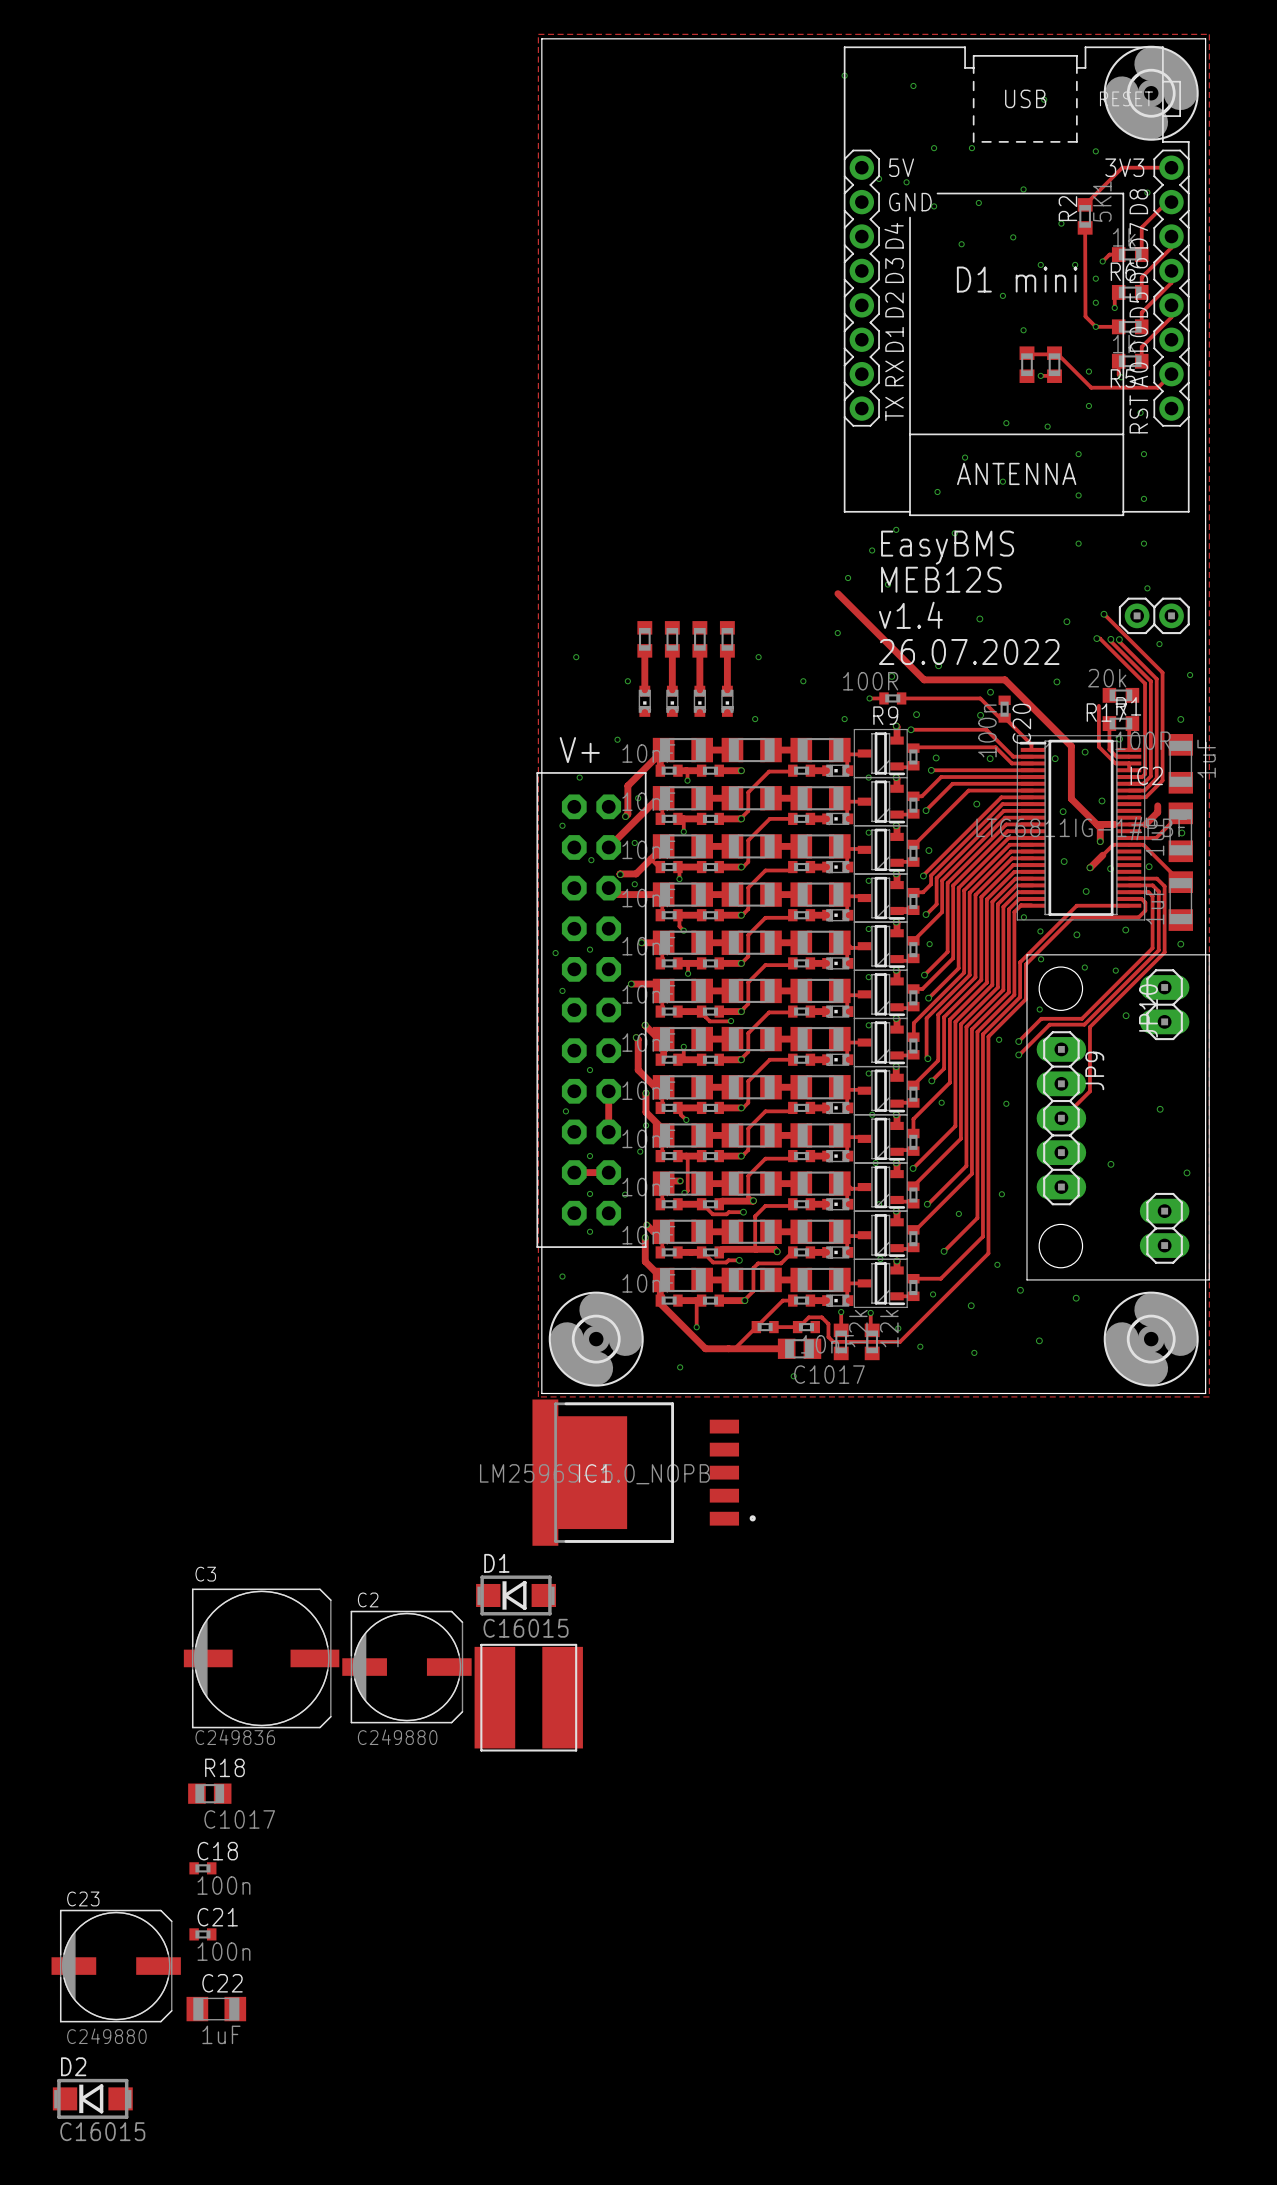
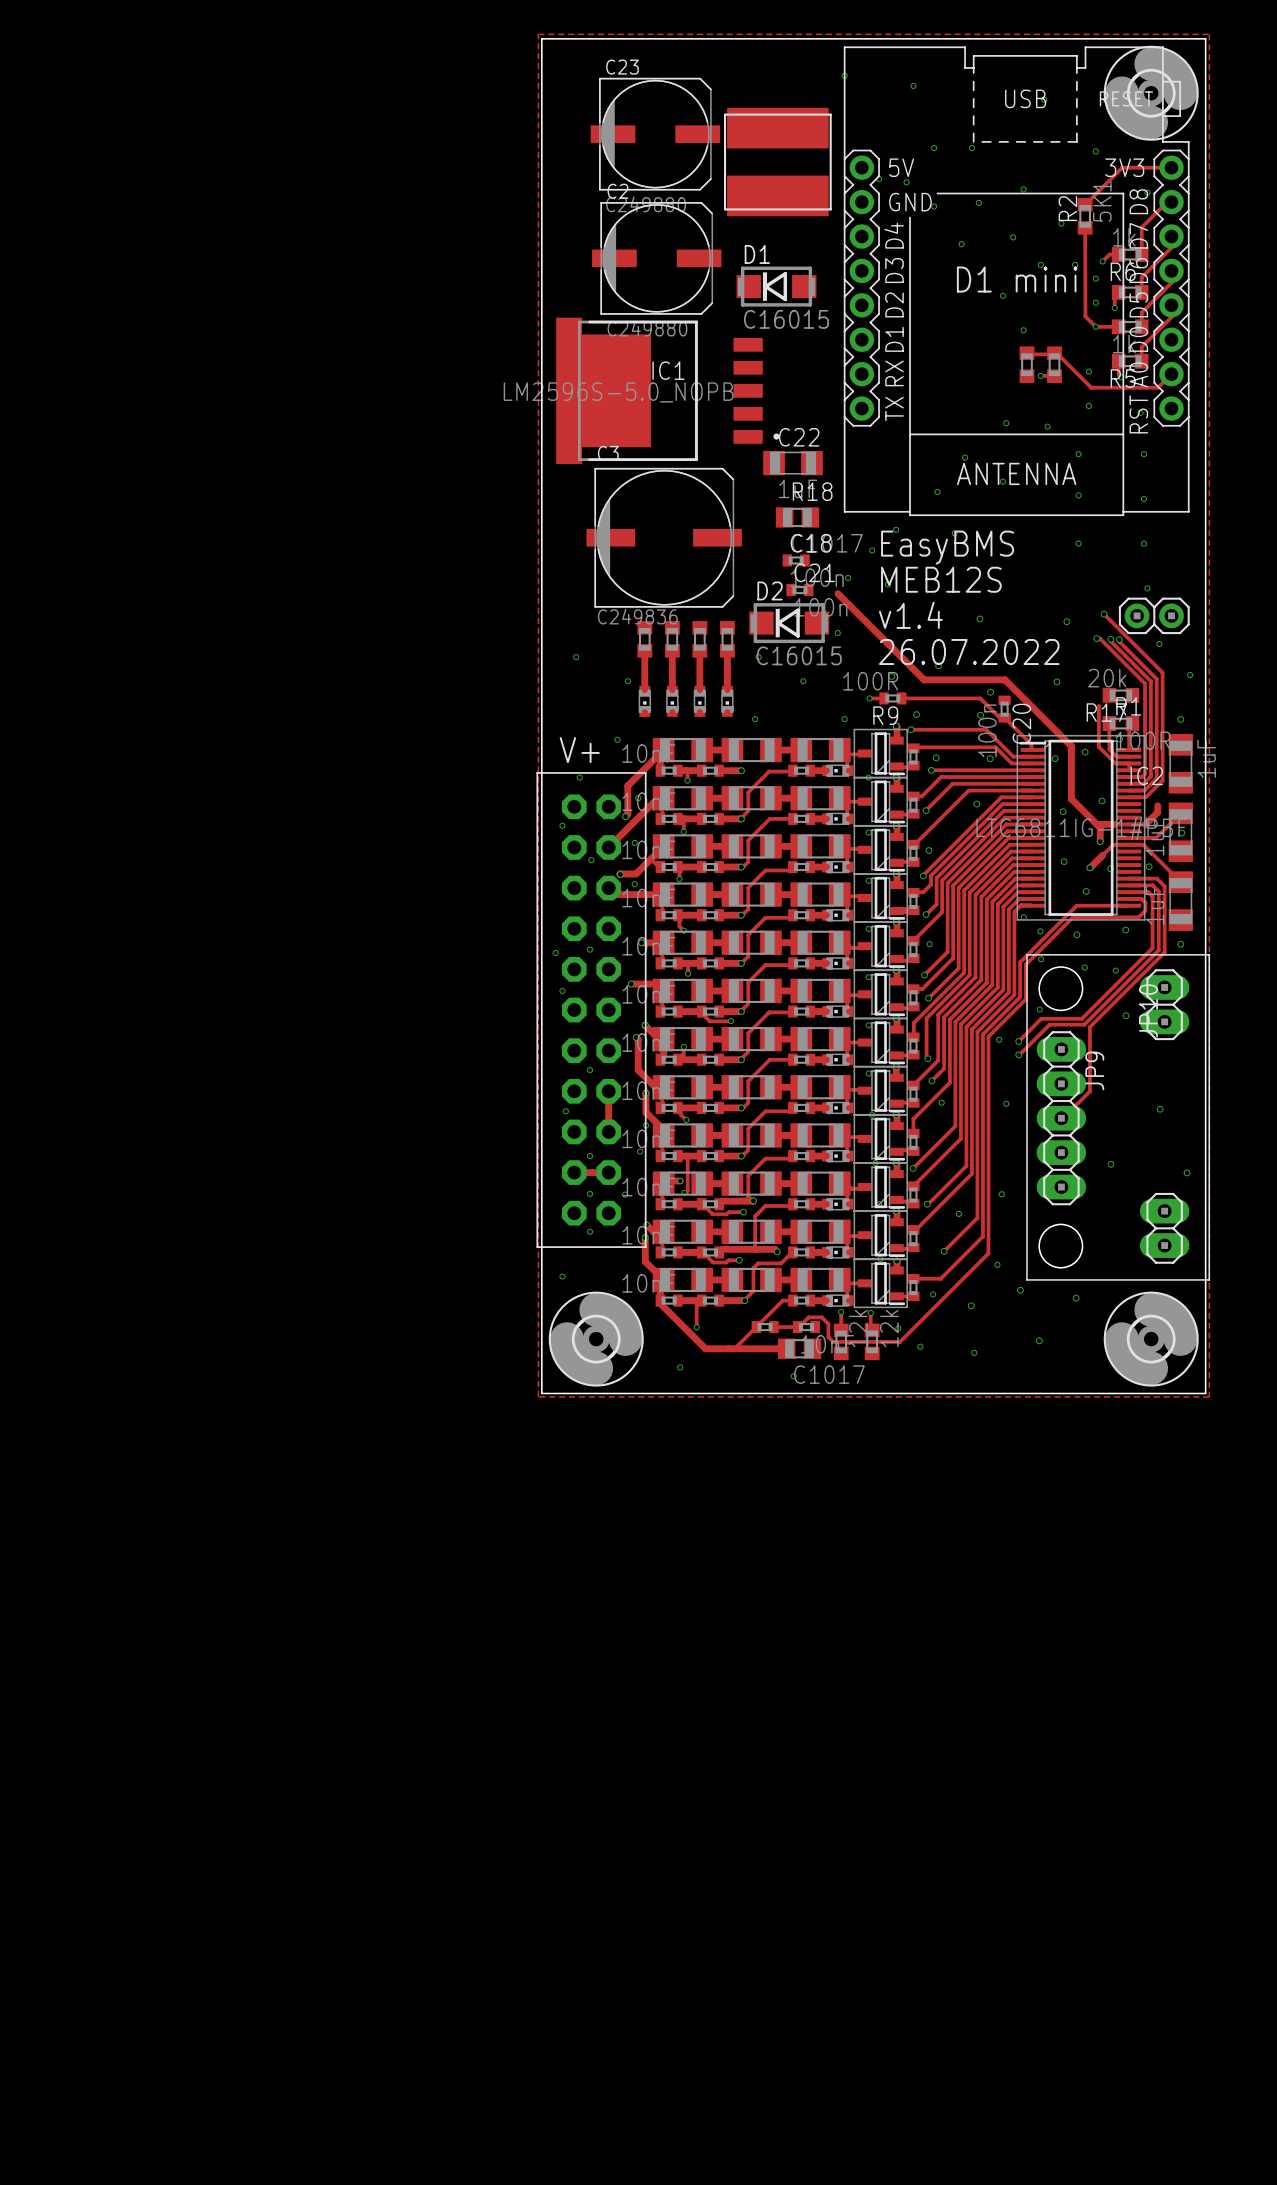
part: none -> (777, 162)
IC1 position: (644, 1472) -> (667, 390)
IC1 name position: IC1 (594, 1473) -> IC1 (668, 370)
D1 position: (516, 1595) -> (776, 286)
C3 position: (261, 1658) -> (664, 537)
C2 position: (406, 1667) -> (656, 258)
part: (528, 1697) -> none
R18 position: (209, 1793) -> (797, 517)
C18 position: (202, 1868) -> (796, 560)
C21 position: (202, 1934) -> (799, 590)
C23 position: (116, 1966) -> (655, 134)
C22 position: (216, 2009) -> (793, 463)
D2 position: (92, 2098) -> (789, 623)

